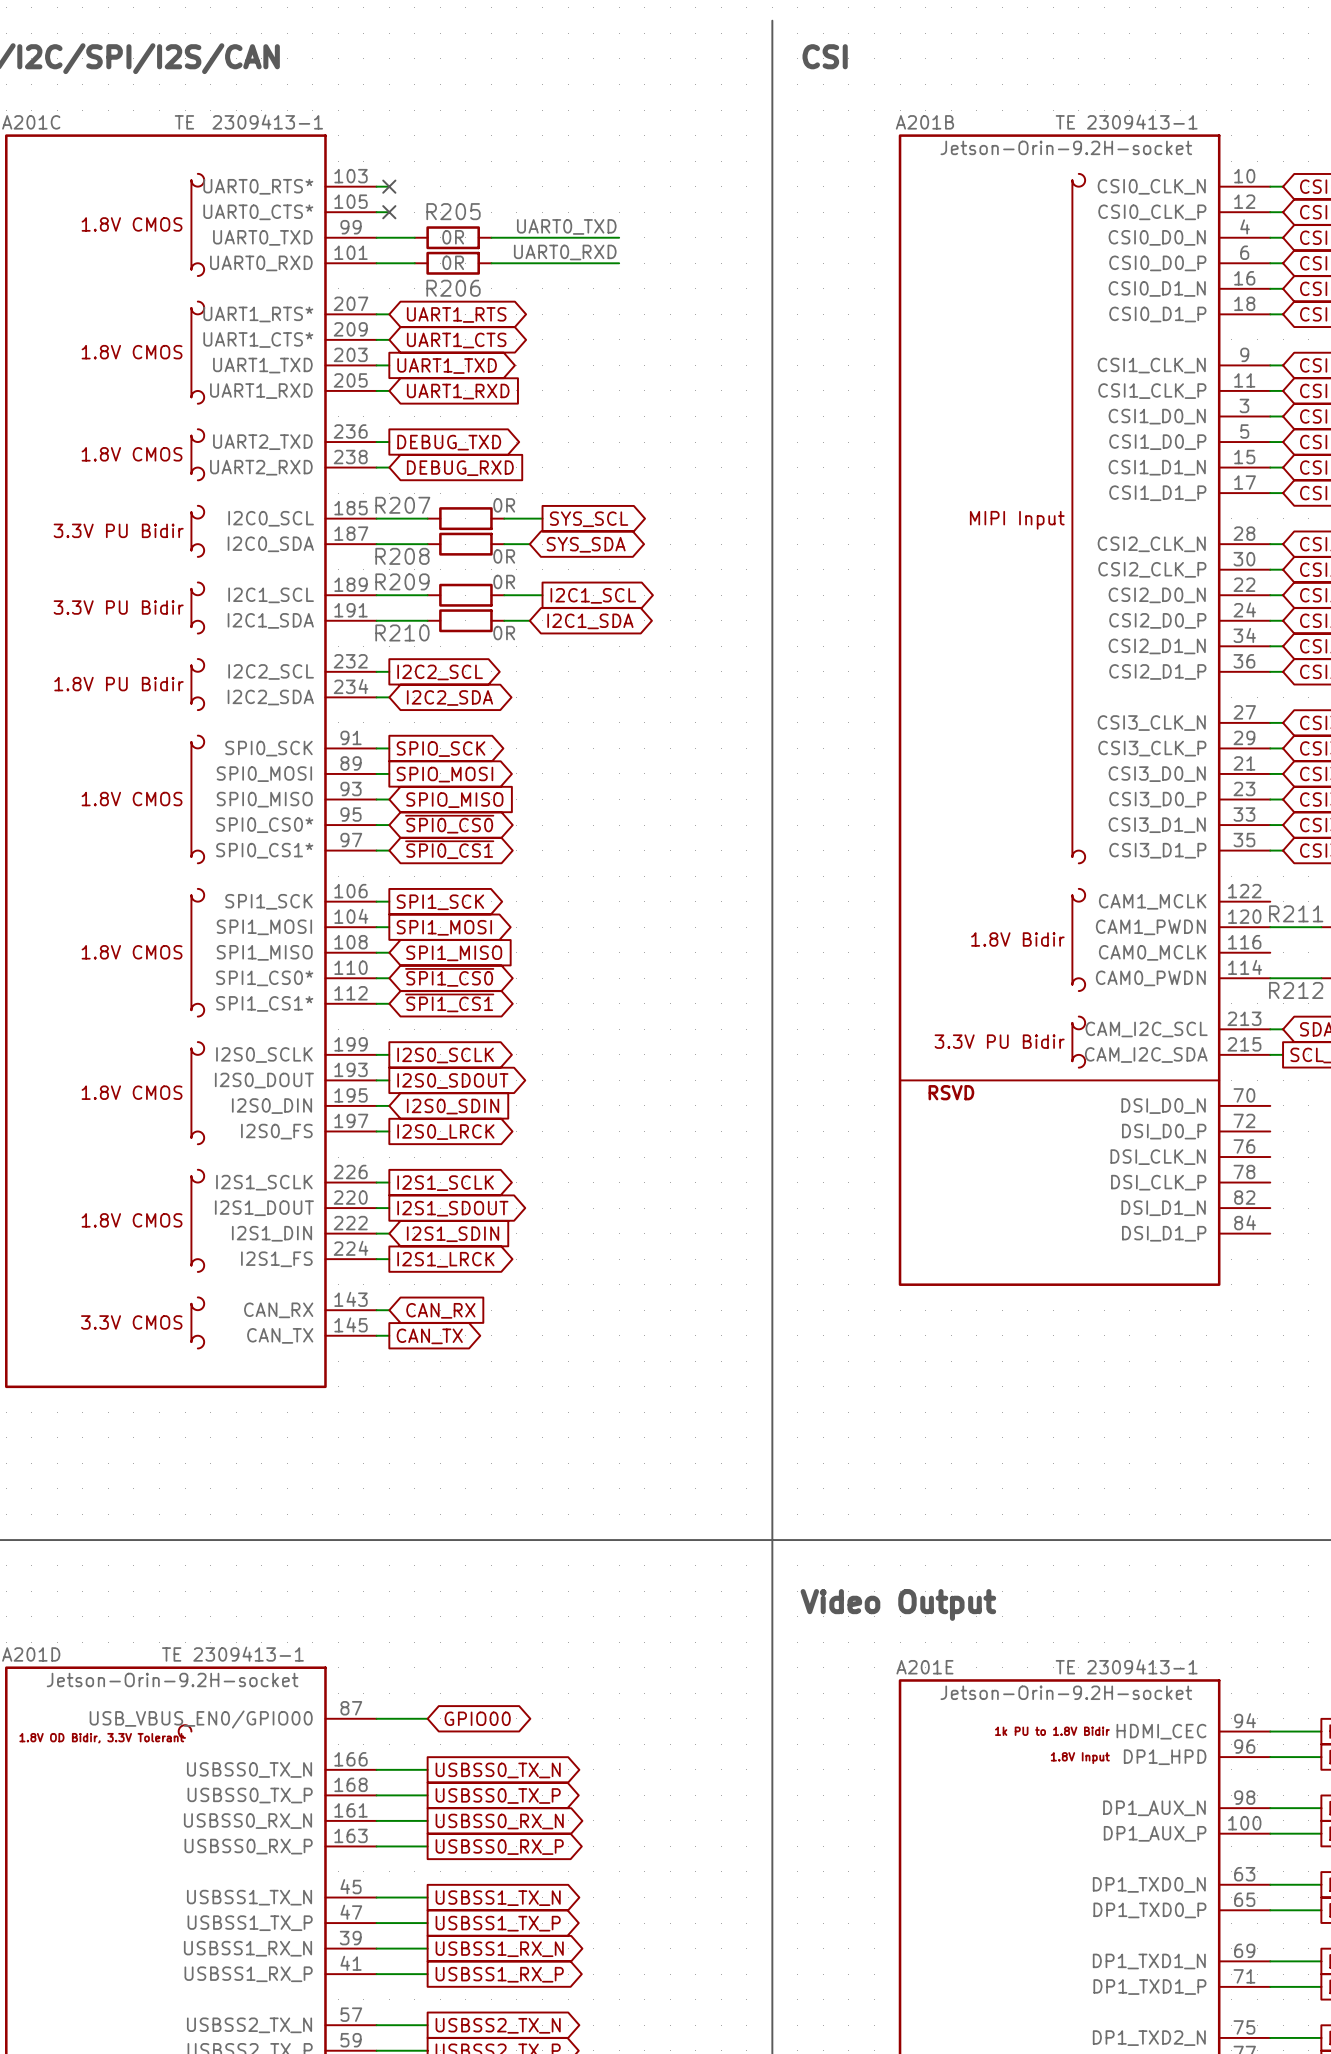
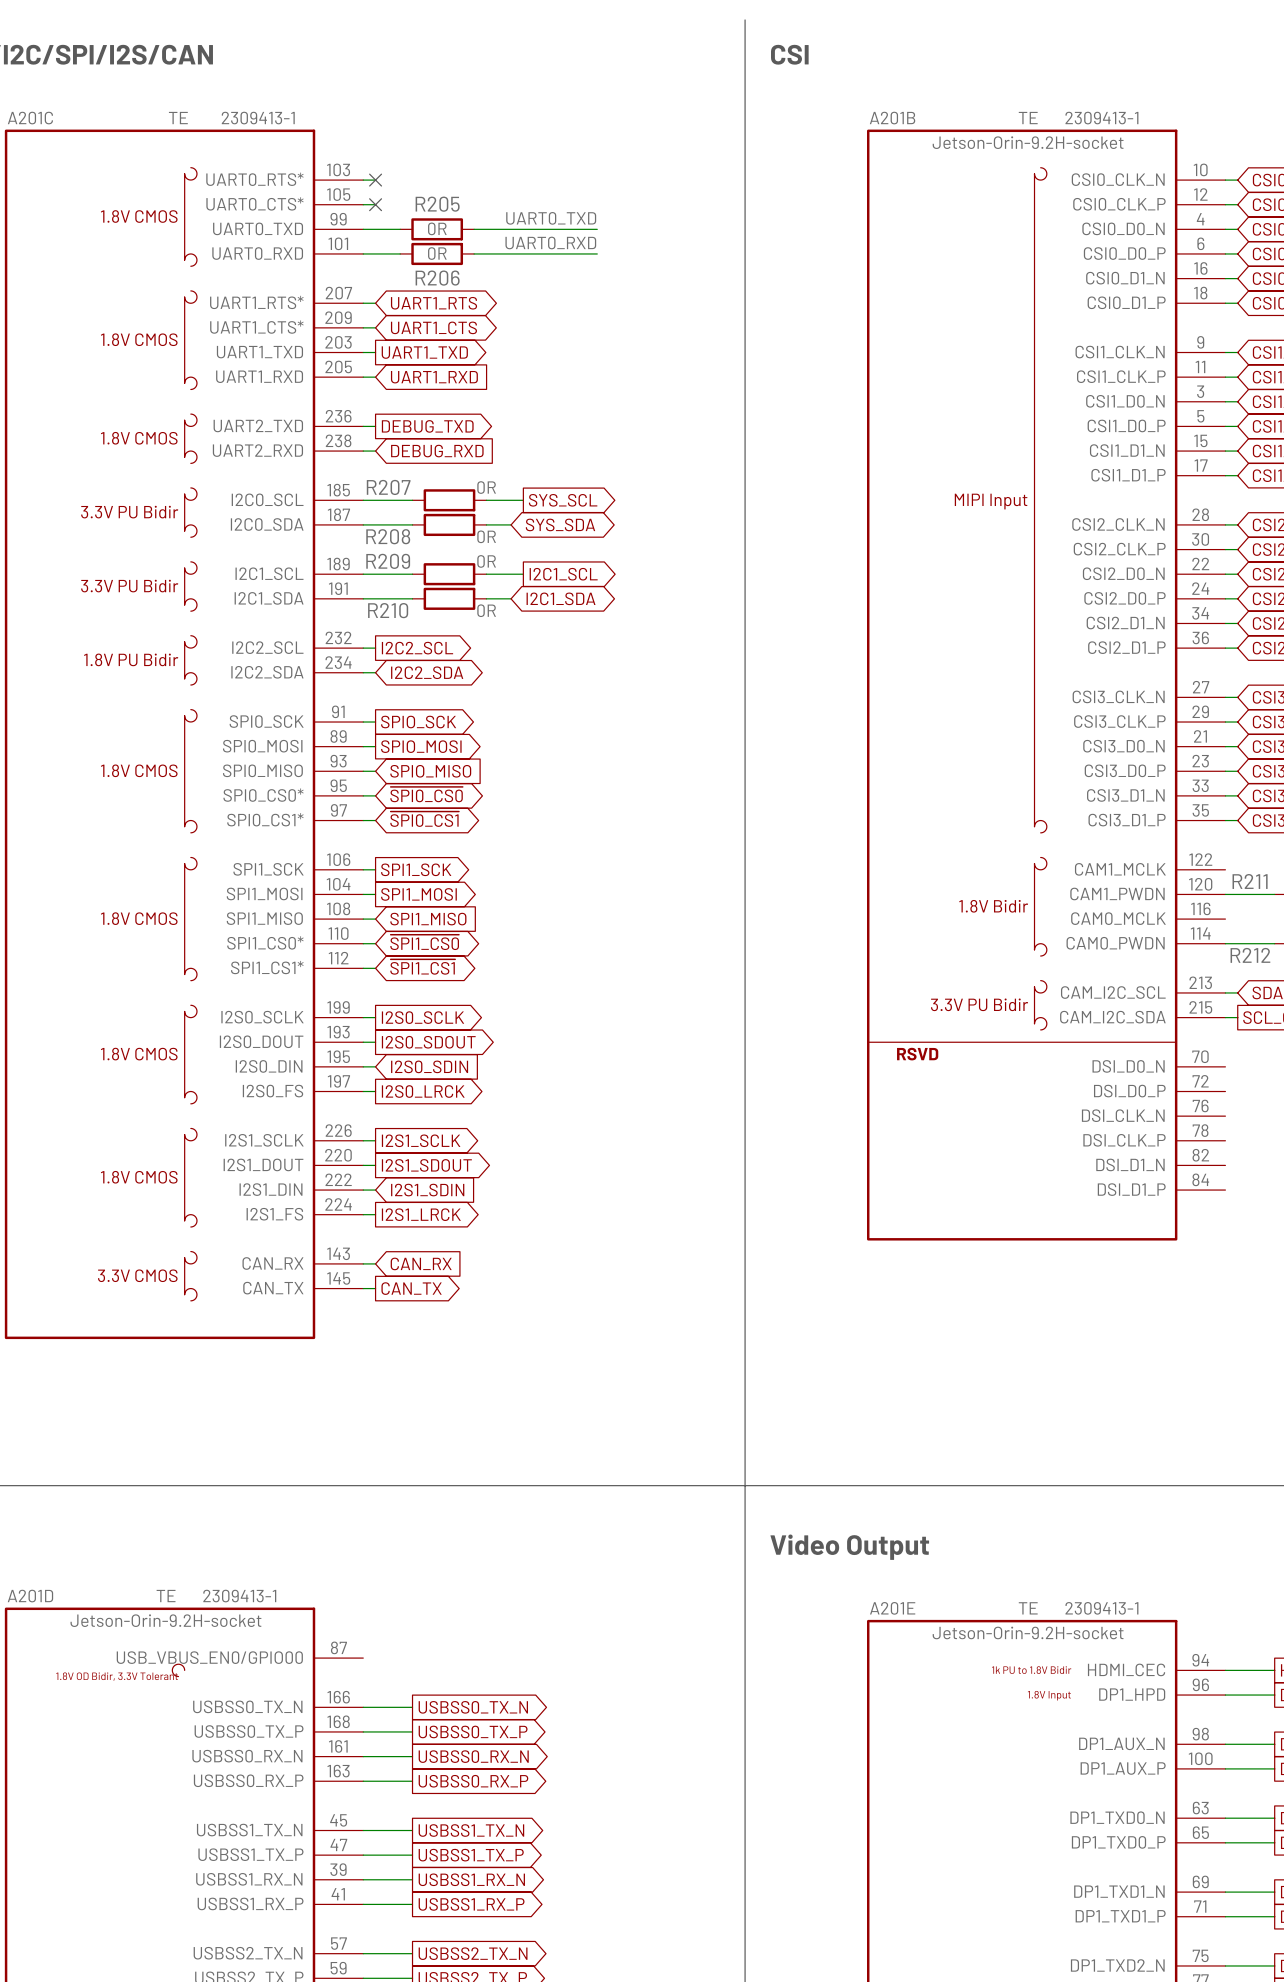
wire: (376, 1718) (427, 1718) -> none
global label: GPIO00 (477, 1718) -> none

